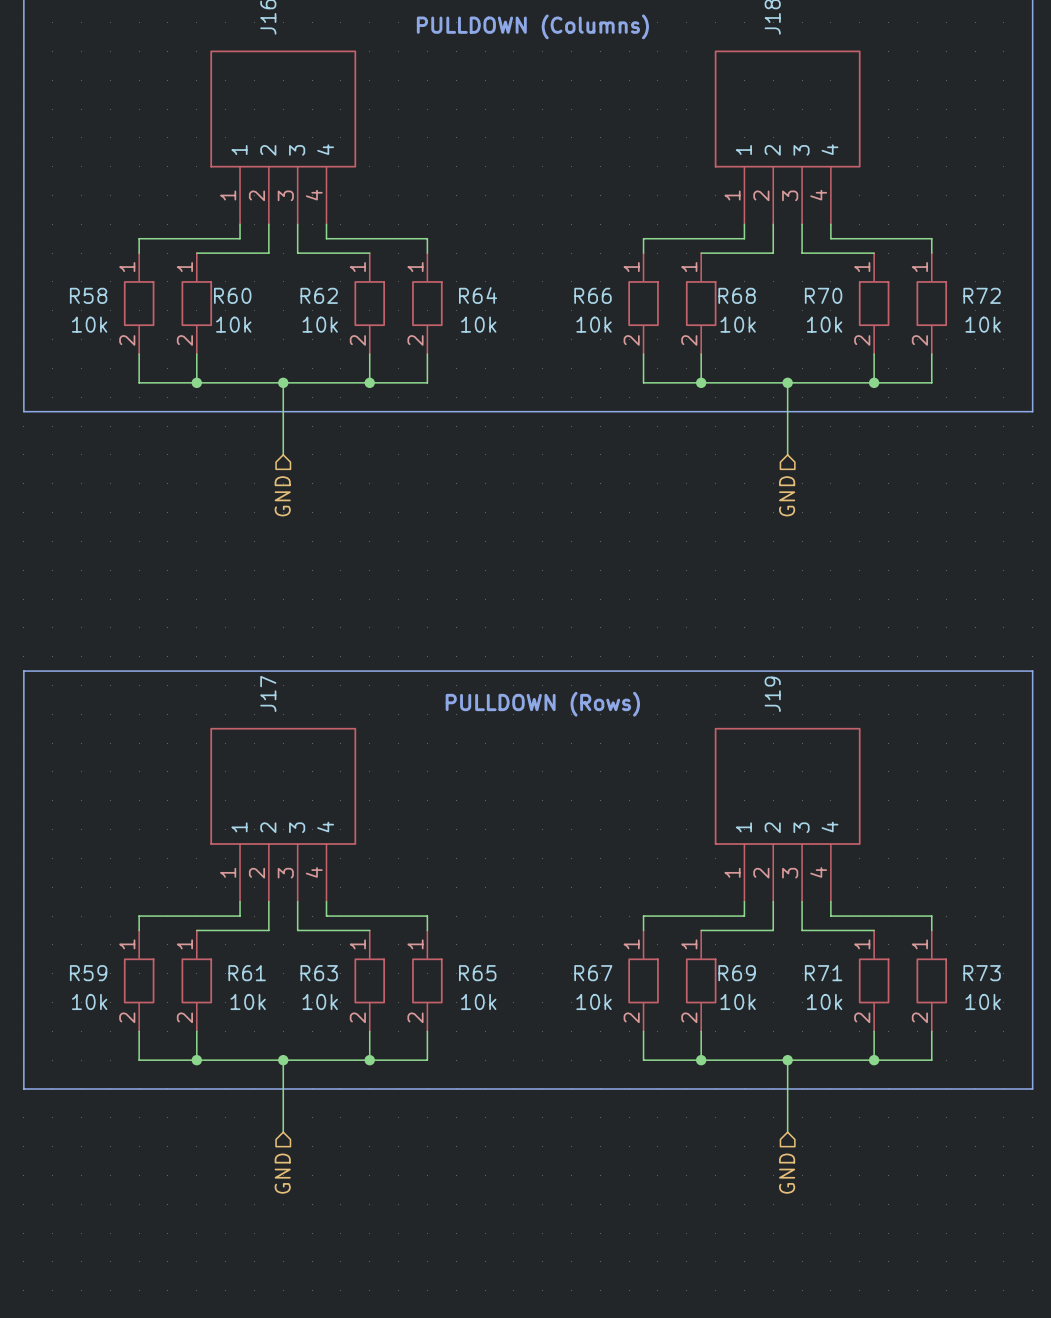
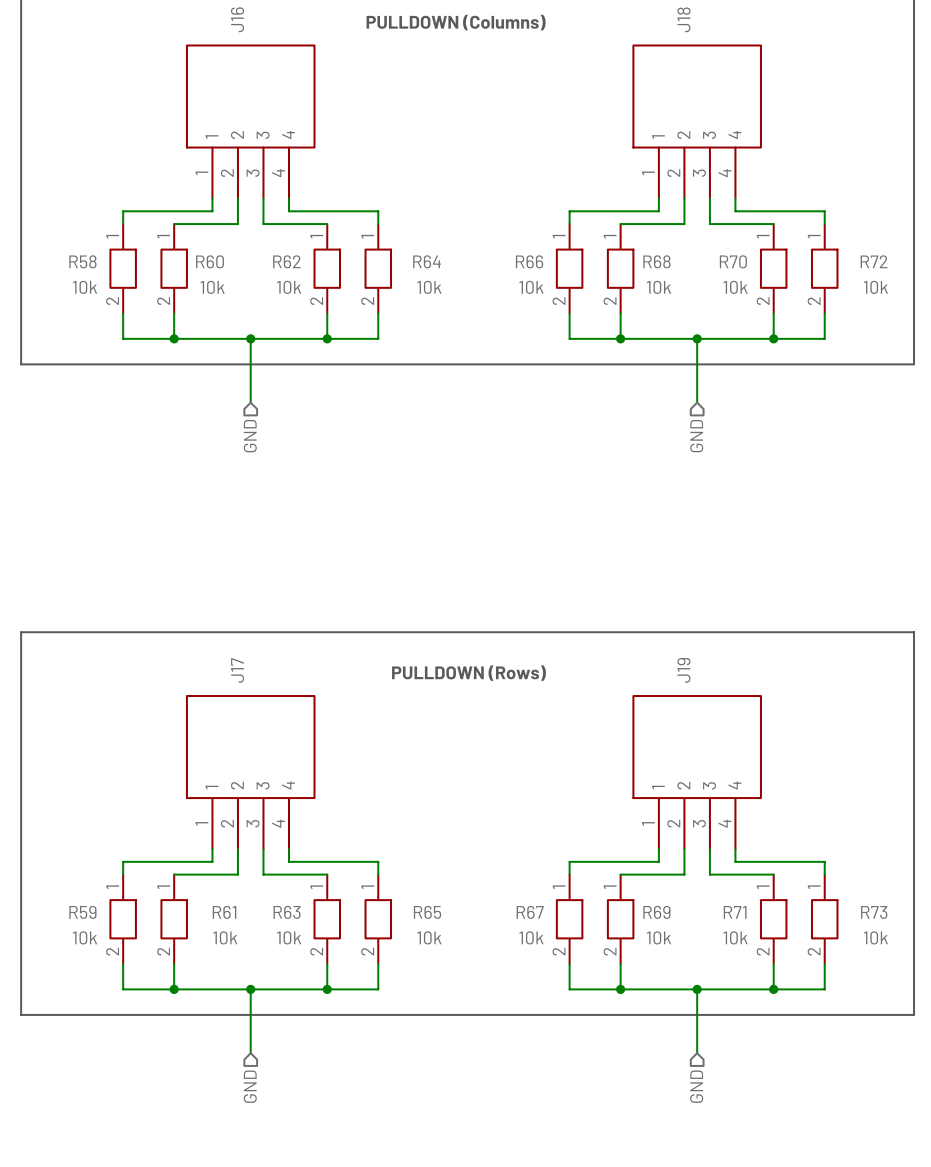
text position: PULLDOWN (Rows) (542, 704) -> PULLDOWN (Rows) (469, 673)
line: (23, 714) (23, 671) (1032, 671) (1032, 714) -> (21, 632) (914, 632)
J17 position: (283, 814) -> (250, 772)
J19 position: (787, 814) -> (697, 772)
wire: (240, 901) (240, 916) (139, 916) (139, 930) -> (212, 849) (212, 861) (123, 861) (123, 874)
wire: (268, 901) (268, 930) (196, 930) -> (237, 849) (237, 874) (174, 874)
wire: (297, 901) (297, 930) (369, 930) -> (263, 849) (263, 874) (327, 874)
wire: (326, 901) (326, 916) (427, 916) (427, 930) -> (288, 849) (288, 861) (378, 861) (378, 874)
wire: (744, 901) (744, 916) (643, 916) (643, 930) -> (658, 849) (658, 861) (569, 861) (569, 874)
wire: (773, 901) (773, 930) (701, 930) -> (684, 849) (684, 874) (620, 874)
wire: (802, 901) (802, 930) (874, 930) -> (709, 849) (709, 874) (773, 874)
wire: (830, 901) (830, 916) (931, 916) (931, 930) -> (735, 849) (735, 861) (824, 861) (824, 874)
R59 position: (139, 980) -> (123, 919)
R61 position: (196, 980) -> (174, 919)
R63 position: (369, 980) -> (327, 919)
R65 position: (427, 980) -> (378, 919)
R67 position: (643, 980) -> (569, 919)
R69 position: (701, 980) -> (620, 919)
R71 position: (874, 980) -> (773, 919)
R73 position: (931, 980) -> (824, 919)
wire: (139, 1031) (139, 1060) (427, 1060) (427, 1031) -> (123, 963) (123, 989) (378, 989) (378, 963)
wire: (196, 1031) (196, 1060) -> (174, 963) (174, 989)
wire: (369, 1031) (369, 1060) -> (327, 963) (327, 989)
wire: (643, 1031) (643, 1060) (931, 1060) (931, 1031) -> (569, 963) (569, 989) (824, 989) (824, 963)
wire: (701, 1031) (701, 1060) -> (620, 963) (620, 989)
wire: (874, 1031) (874, 1060) -> (773, 963) (773, 989)
junction: (196, 1060) -> none
wire: (283, 1060) (283, 1117) -> (250, 1002) (250, 1053)
junction: (283, 1060) -> none
junction: (369, 1060) -> none
junction: (701, 1060) -> none
wire: (787, 1060) (787, 1117) -> (697, 1002) (697, 1053)
junction: (787, 1060) -> none
junction: (874, 1060) -> none
line: (23, 1088) (1032, 1088) -> (21, 963) (21, 1014) (914, 1014) (914, 963)
junction: none -> (174, 989)
junction: none -> (250, 989)
junction: none -> (327, 989)
junction: none -> (620, 989)
junction: none -> (697, 989)
junction: none -> (773, 989)
hierarchical label position: GND (282, 1173) -> GND (250, 1086)
hierarchical label position: GND (787, 1173) -> GND (696, 1086)

